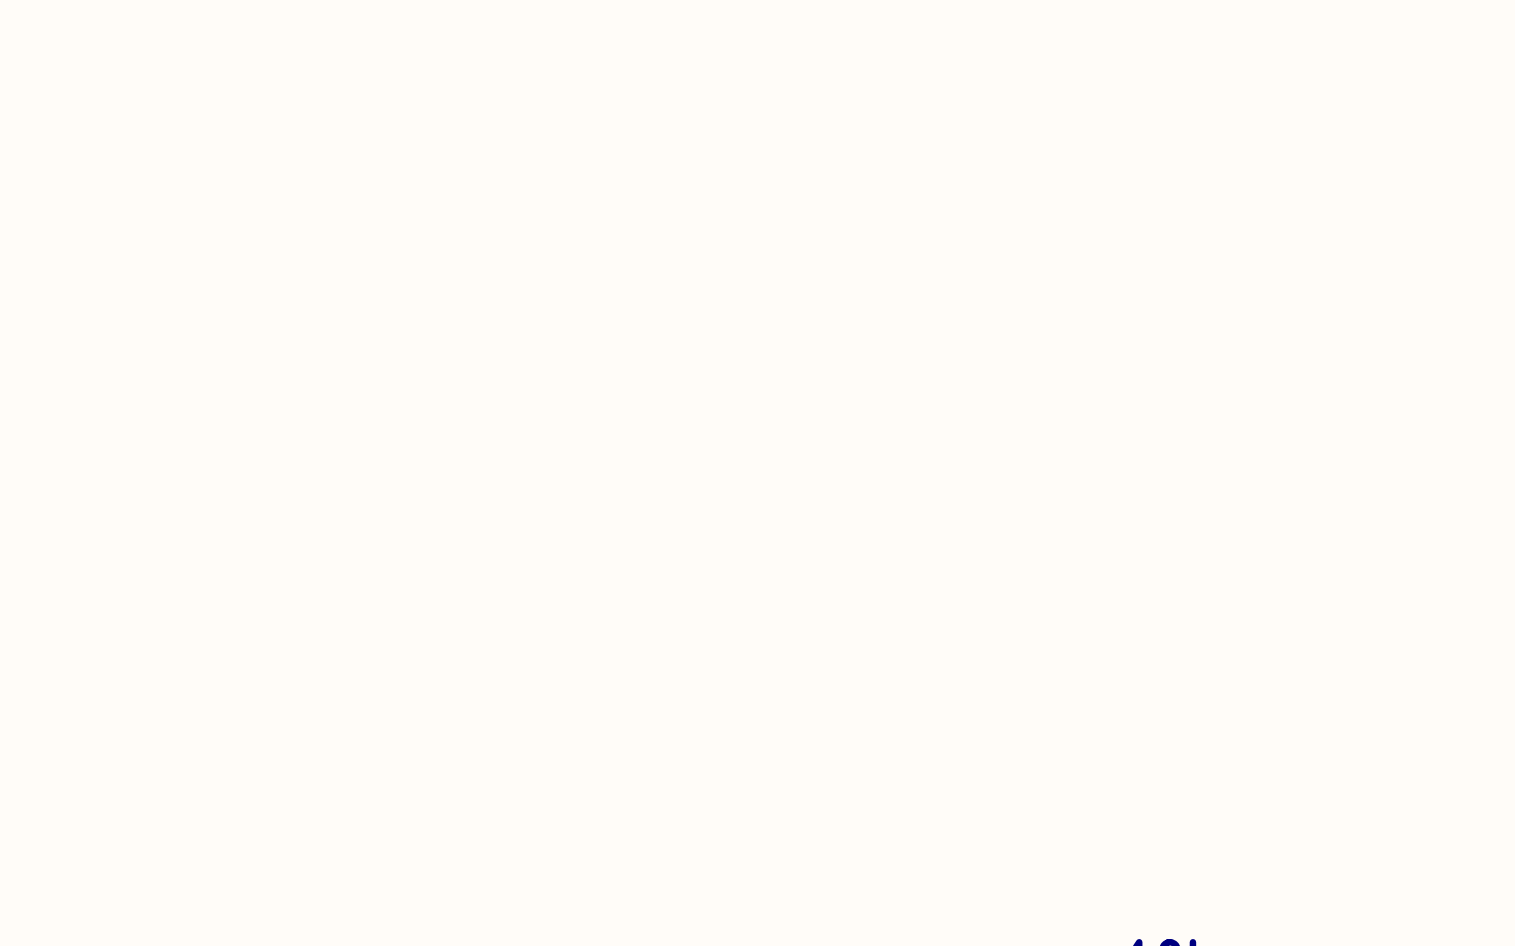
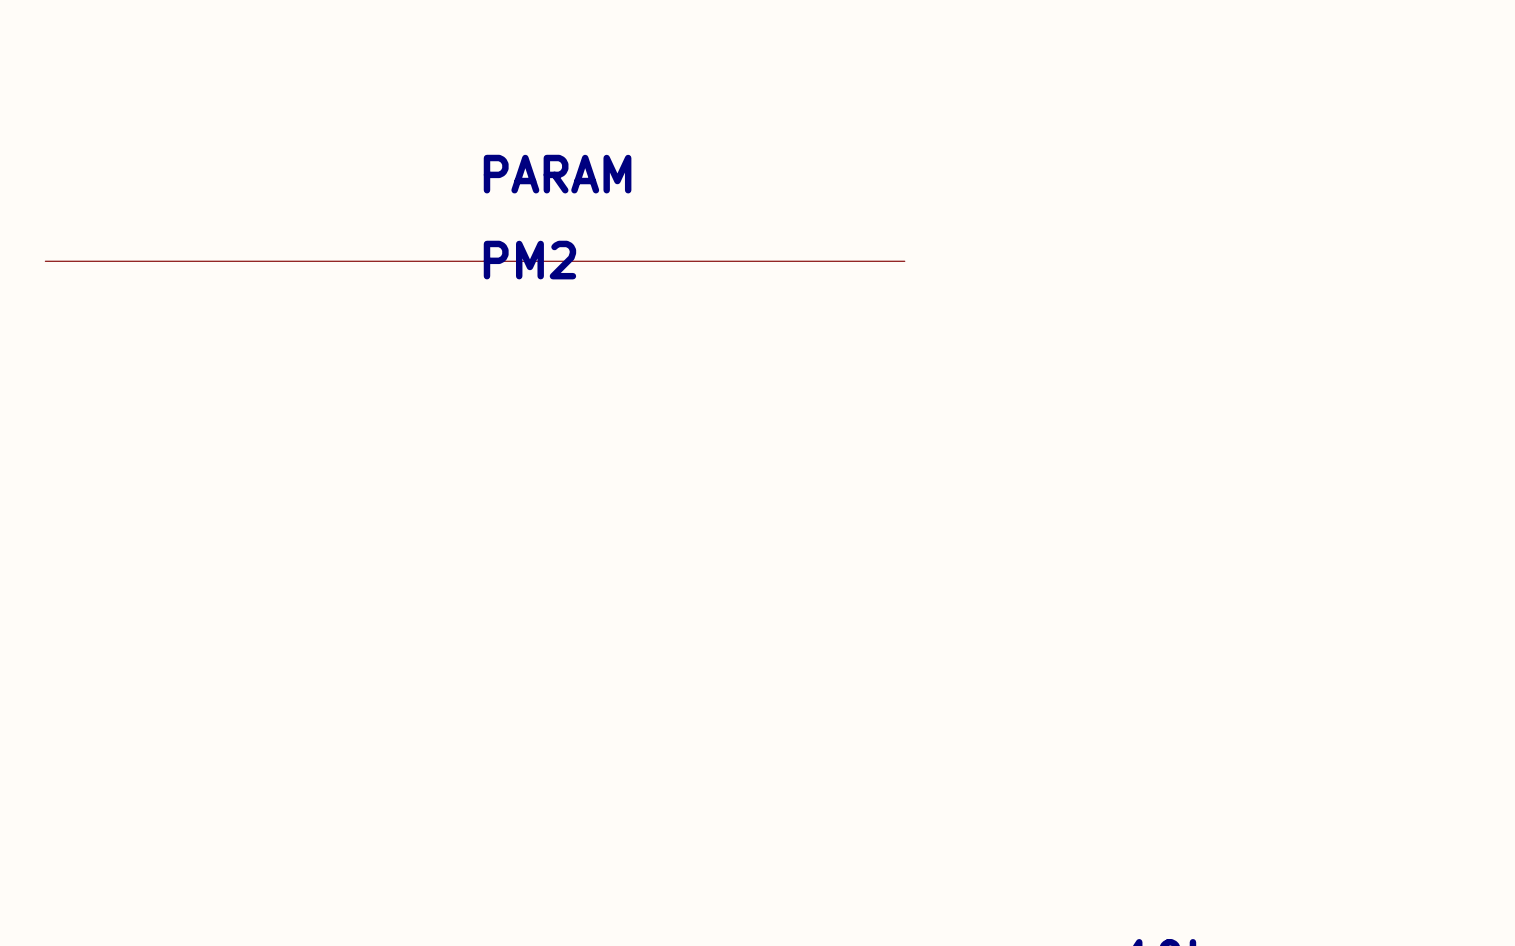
PM2: none -> PARAM (475, 261)

